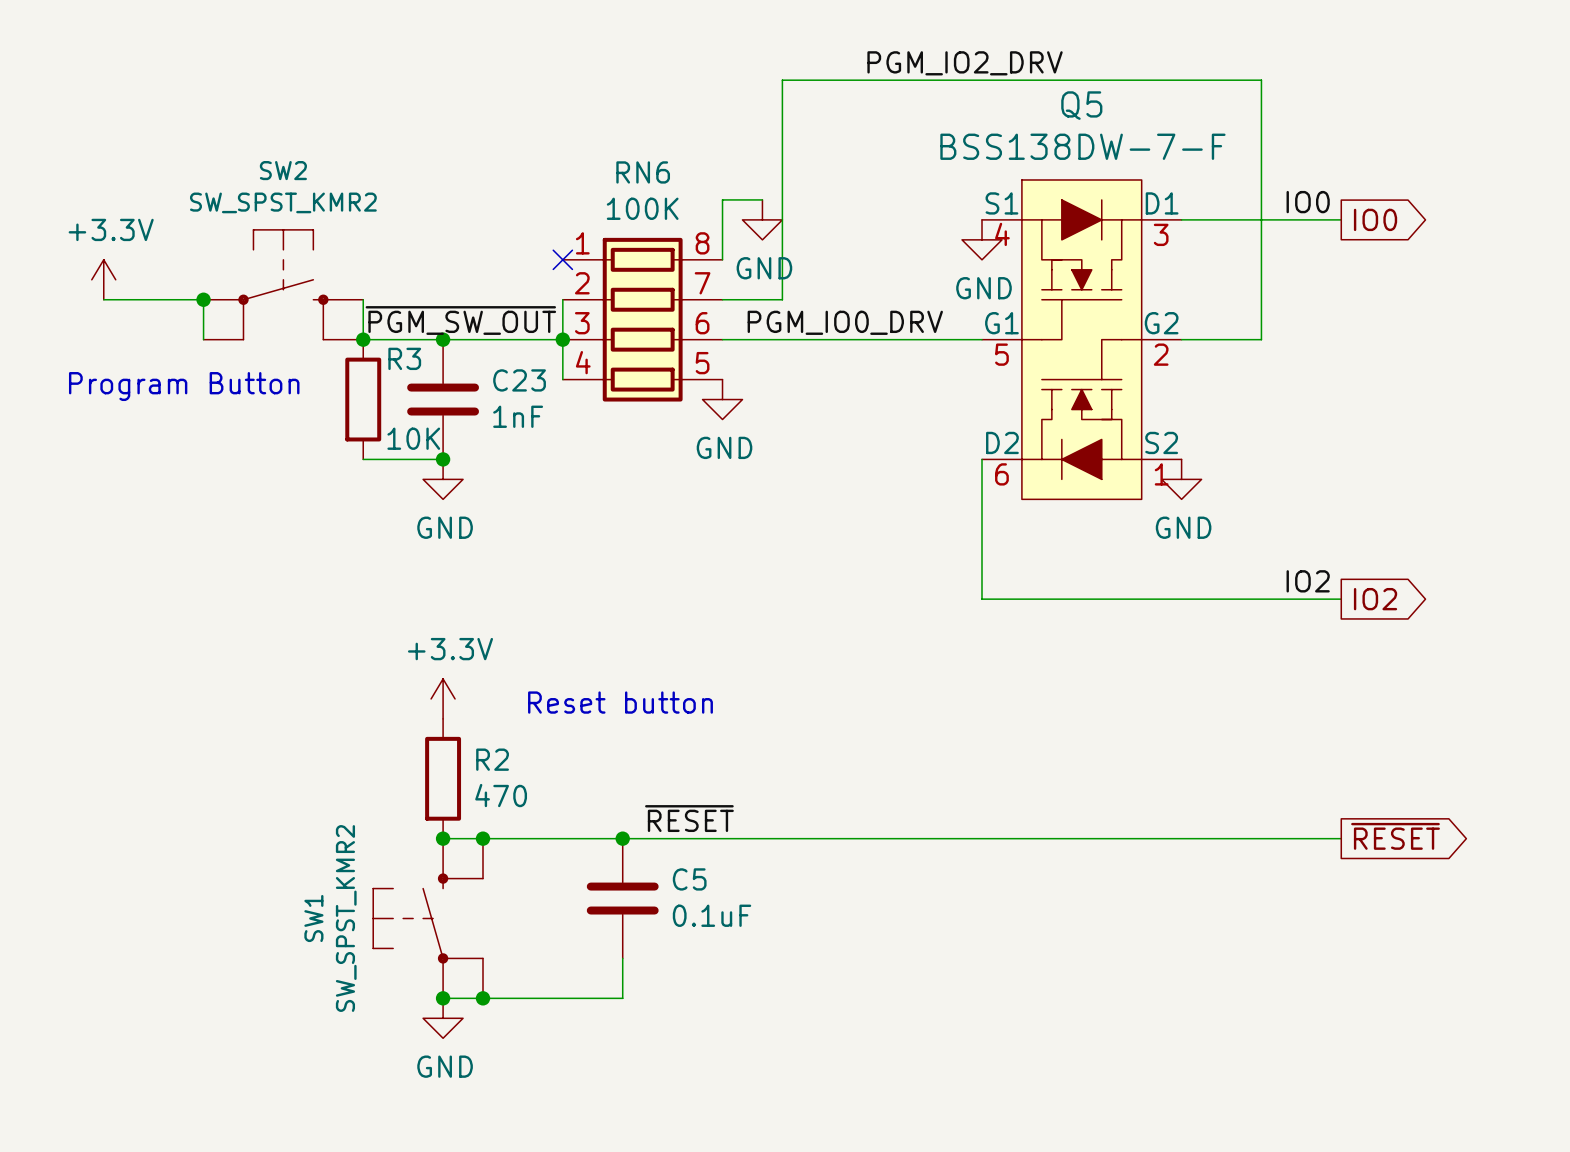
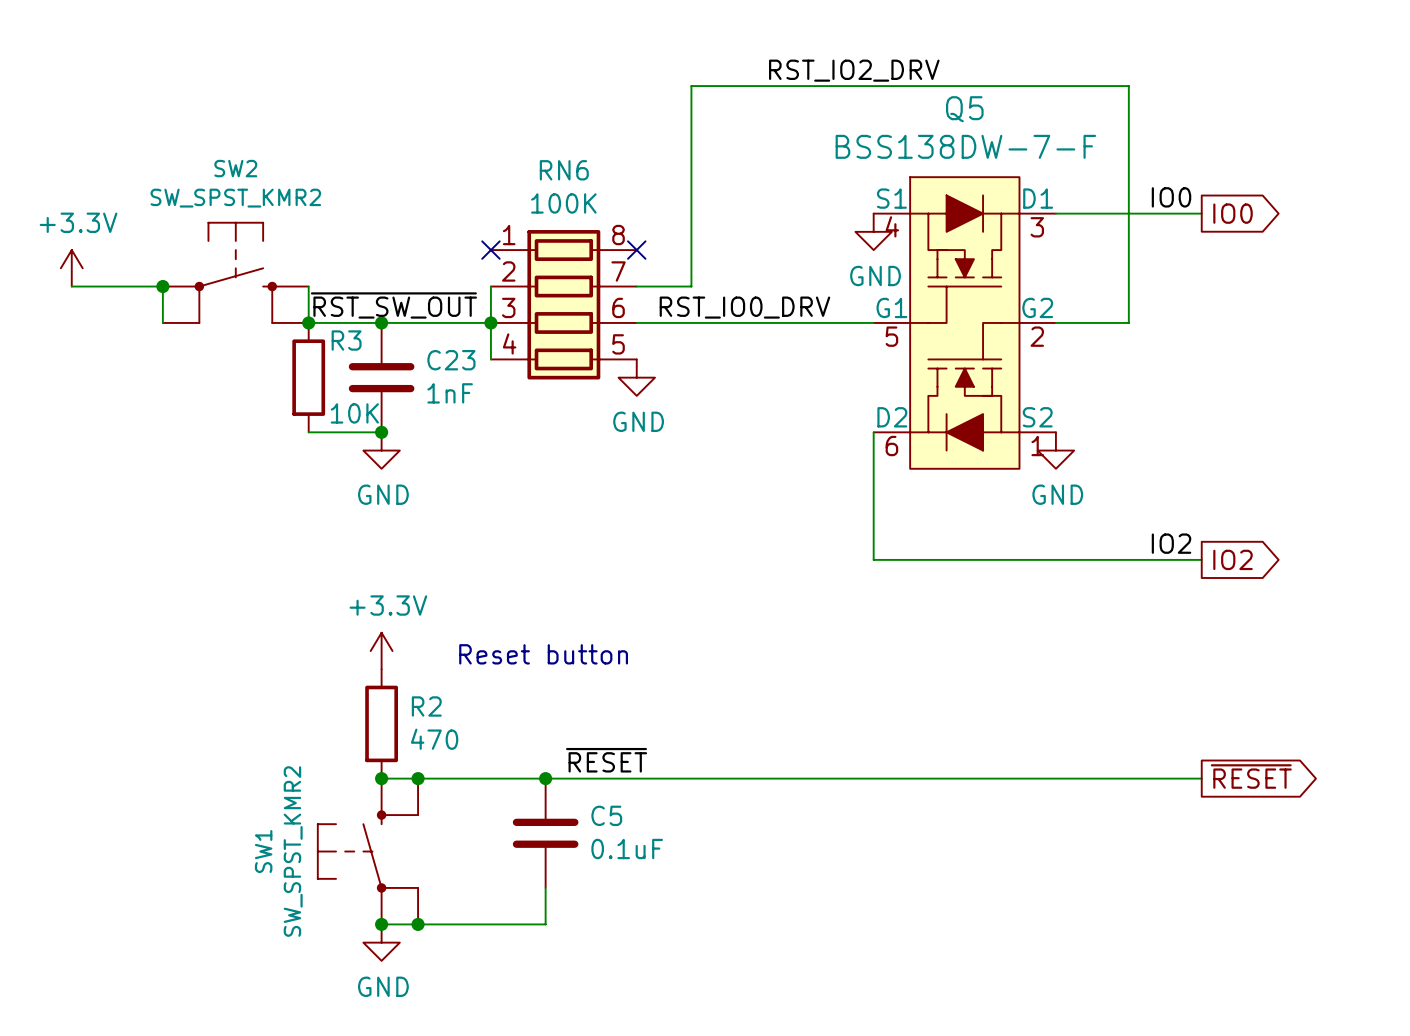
label: PGM_IO2_DRV (965, 63) -> RST_IO2_DRV (854, 70)
wire: (762, 199) (722, 199) (722, 259) -> none
power symbol: GND (762, 219) -> none
no-connect mark: none -> (636, 250)
label: ~{PGM_SW_OUT} (460, 320) -> ~{RST_SW_OUT} (393, 305)
label: PGM_IO0_DRV (845, 322) -> RST_IO0_DRV (744, 307)
text: Program Button (184, 386) -> none

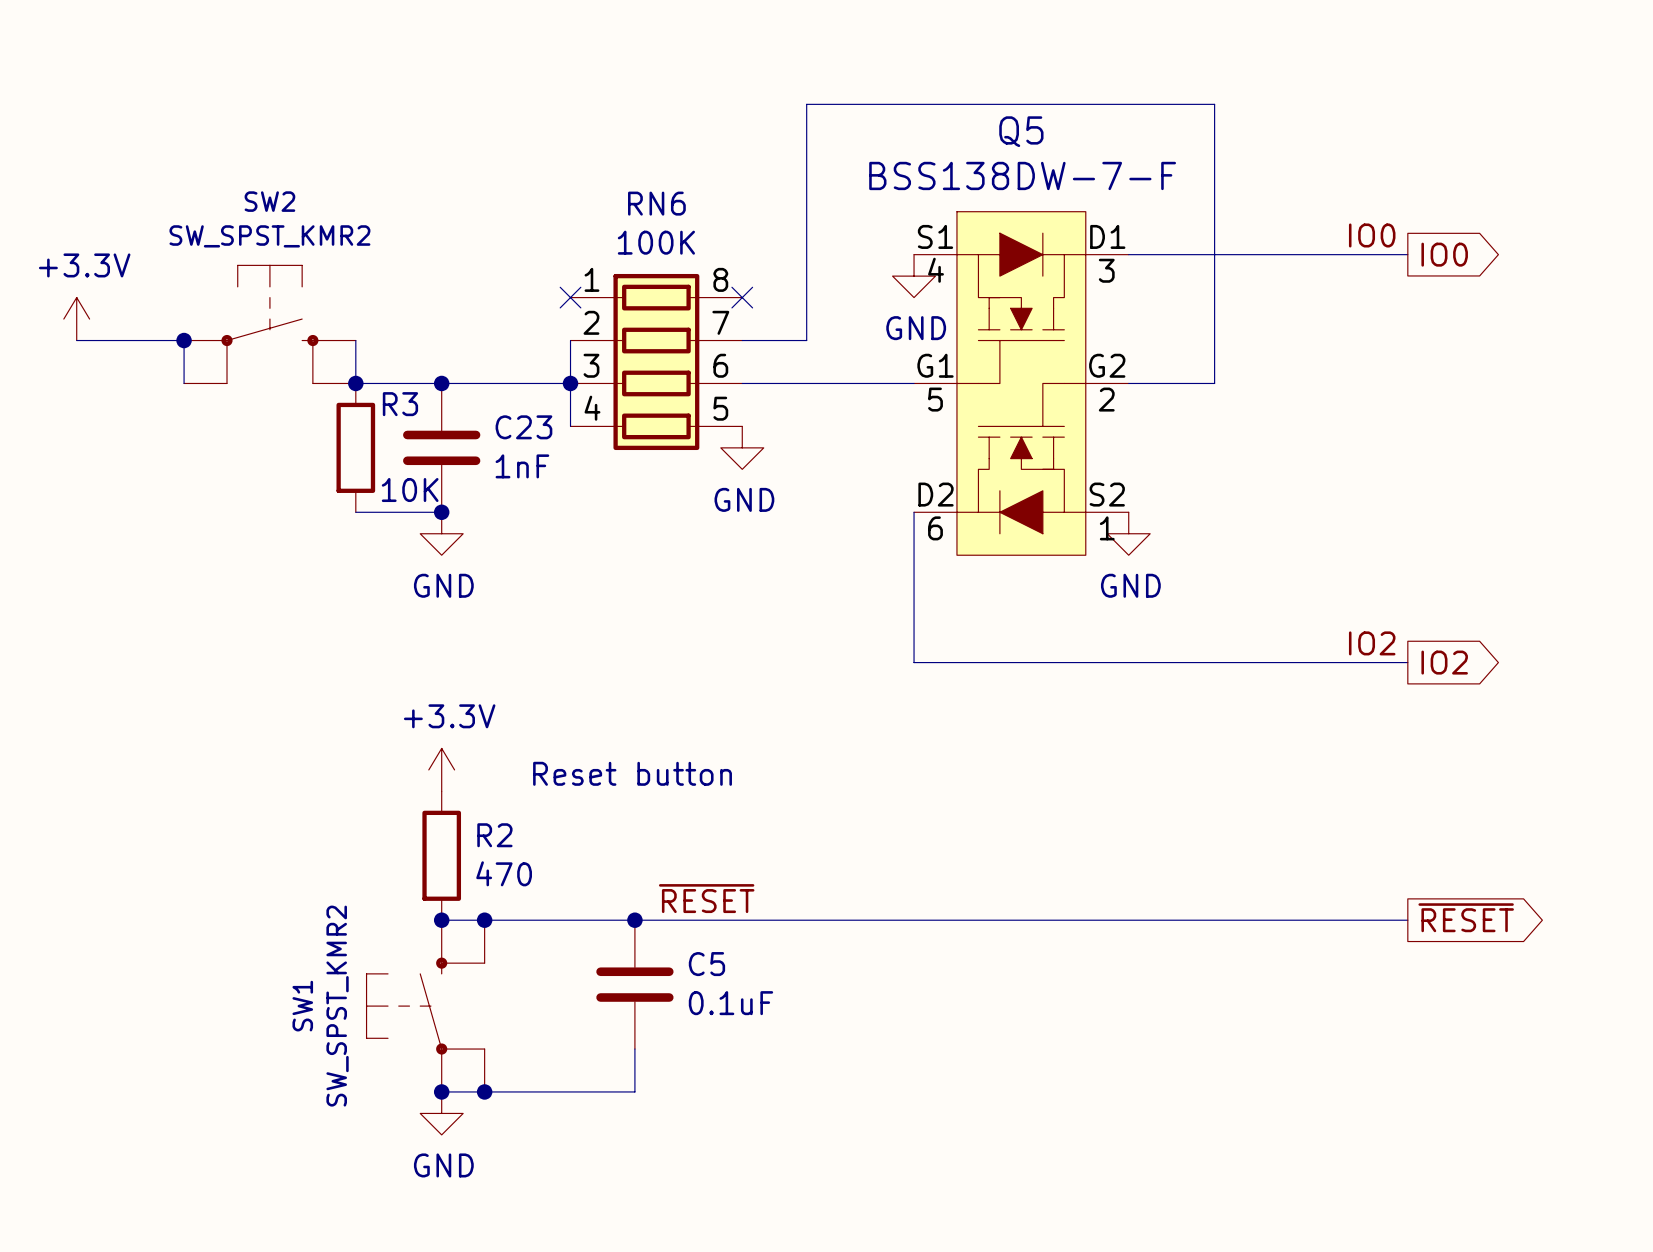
label: RST_IO2_DRV (854, 70) -> none
wire: (1037, 86) (1128, 86) (1128, 322) (1055, 322) -> (1214, 104) (1214, 383) (1128, 383)
power symbol position: GND (873, 231) -> GND (914, 276)
label: ~{RST_SW_OUT} (393, 305) -> none
label: RST_IO0_DRV (744, 307) -> none
Q5 position: (964, 322) -> (1021, 383)
wire: (873, 432) (873, 559) -> (914, 512) (914, 662) (1021, 662)
power symbol position: GND (1055, 450) -> GND (1128, 533)

